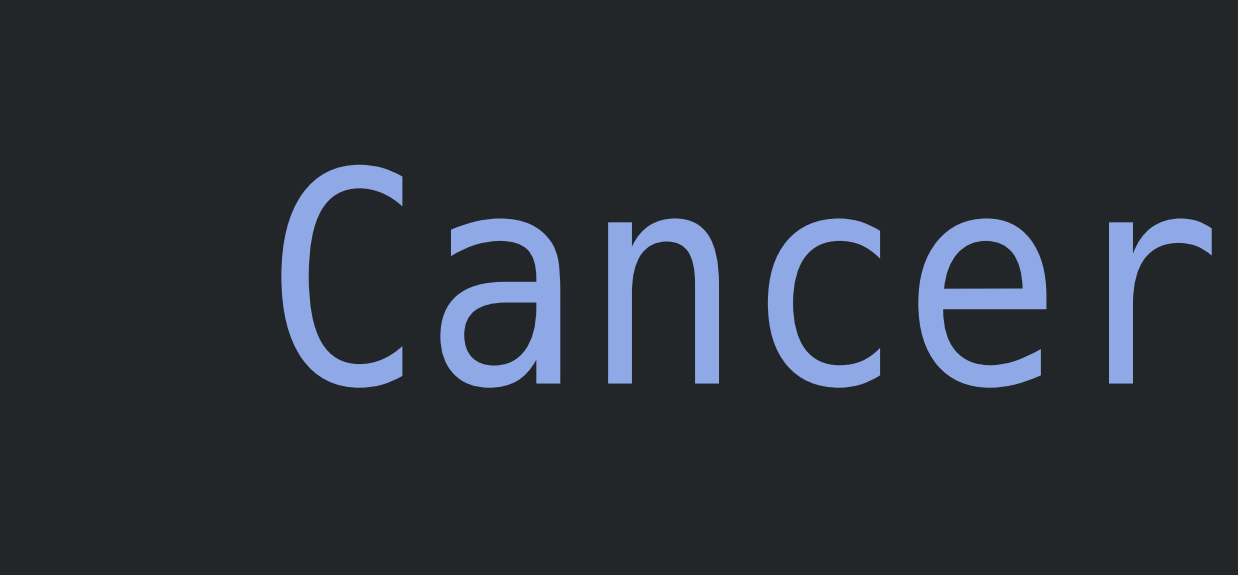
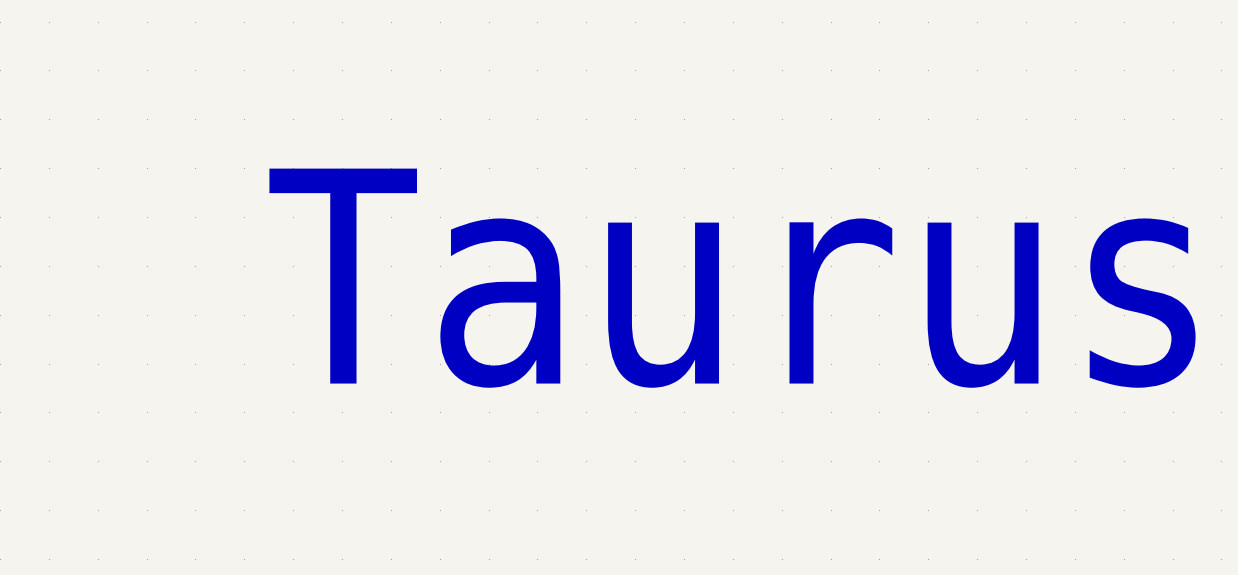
text: Cancer (746, 276) -> Taurus (732, 278)

